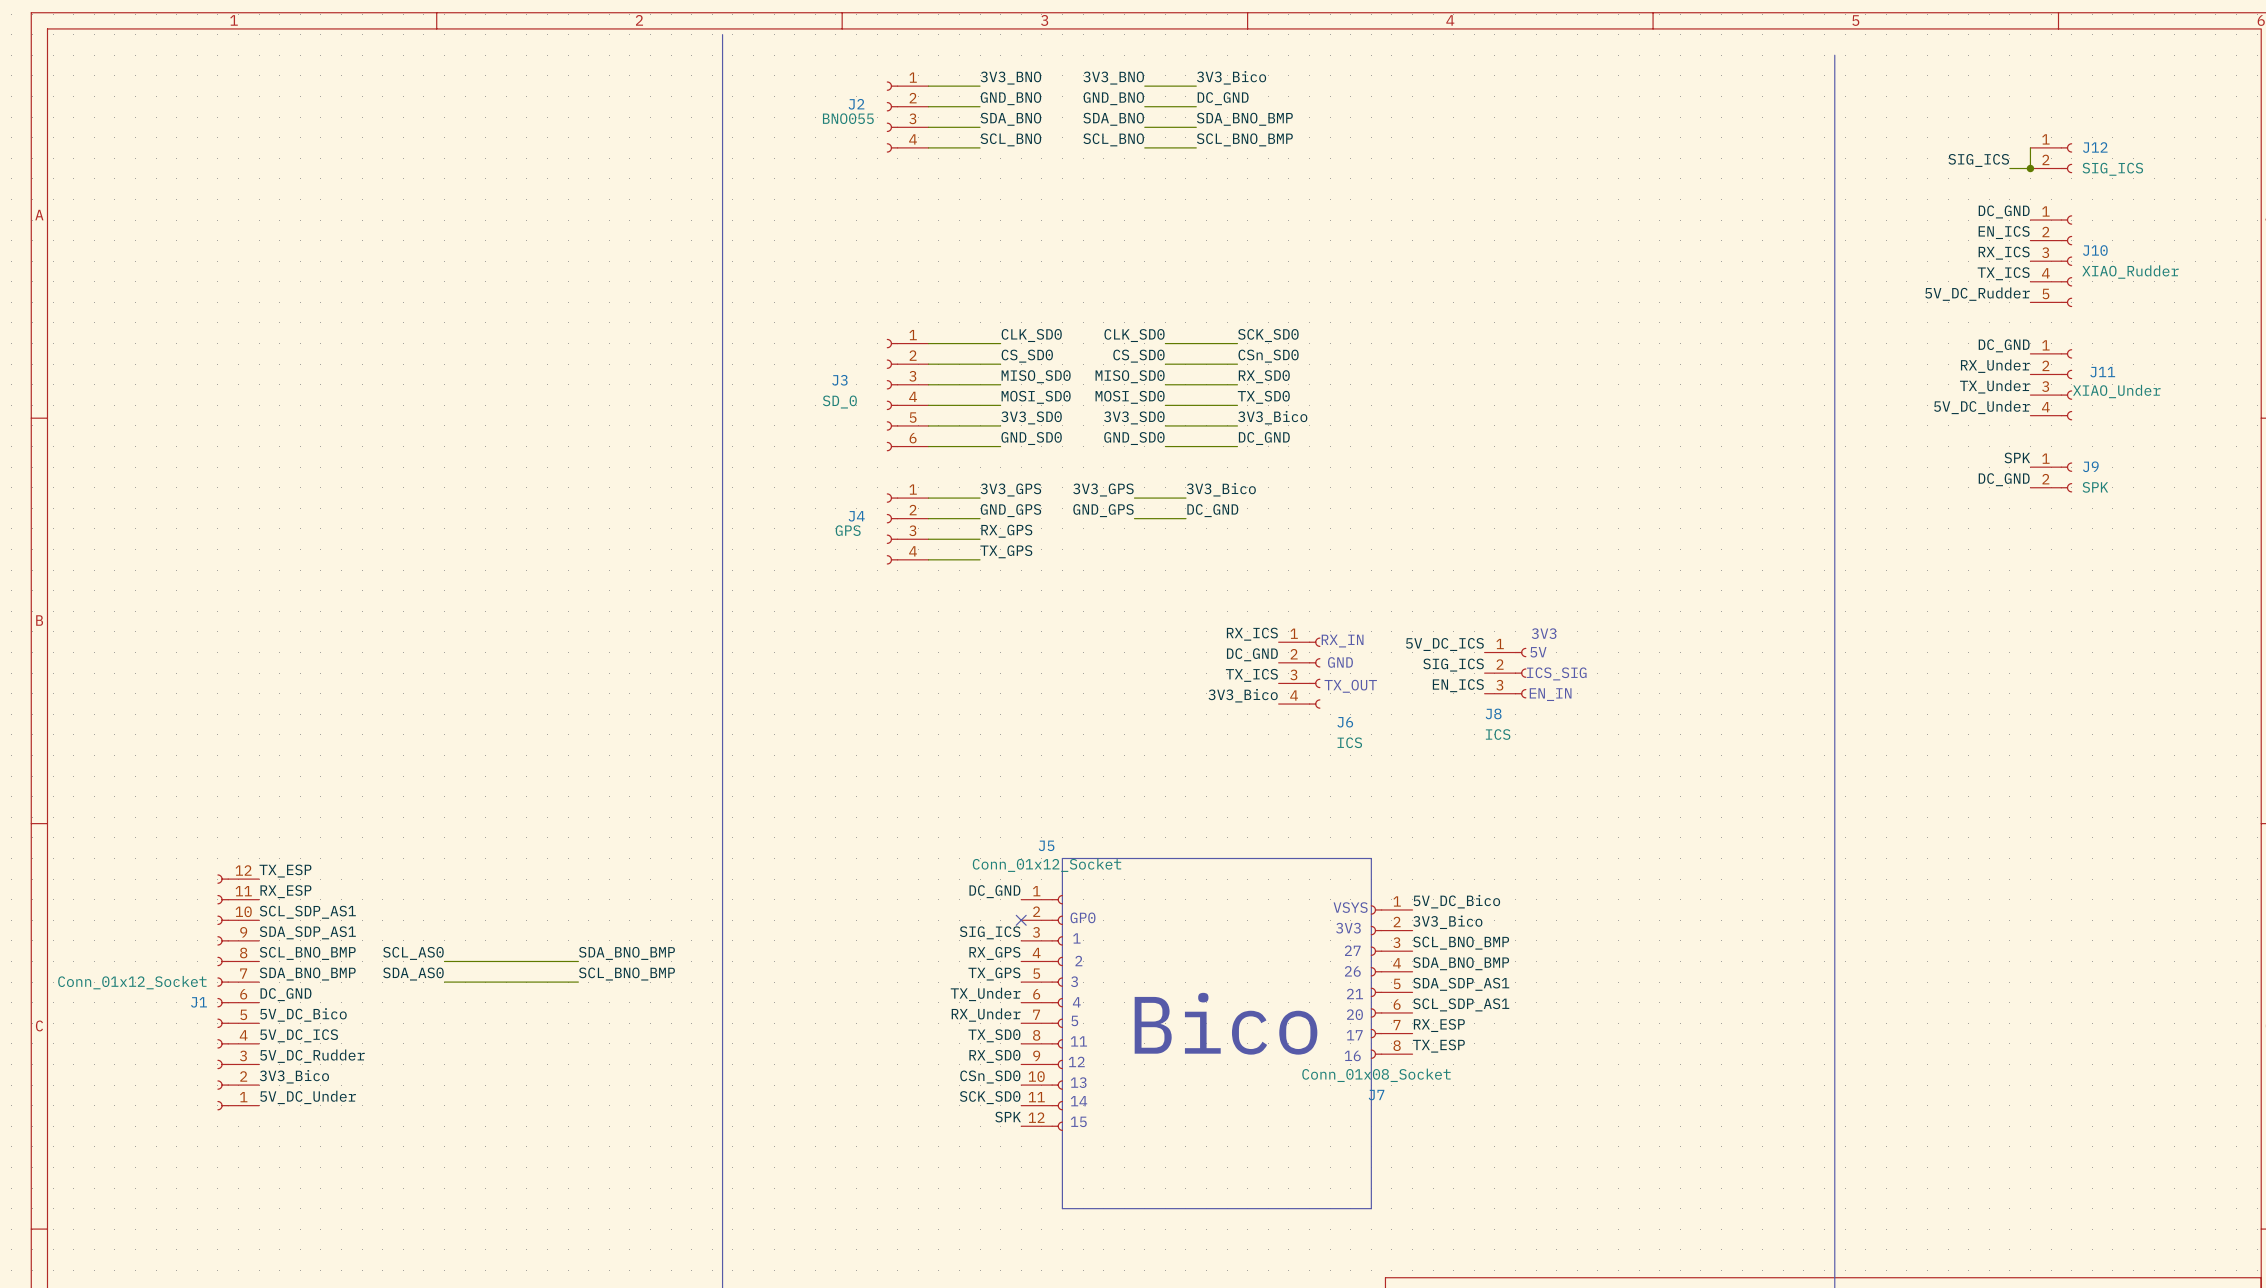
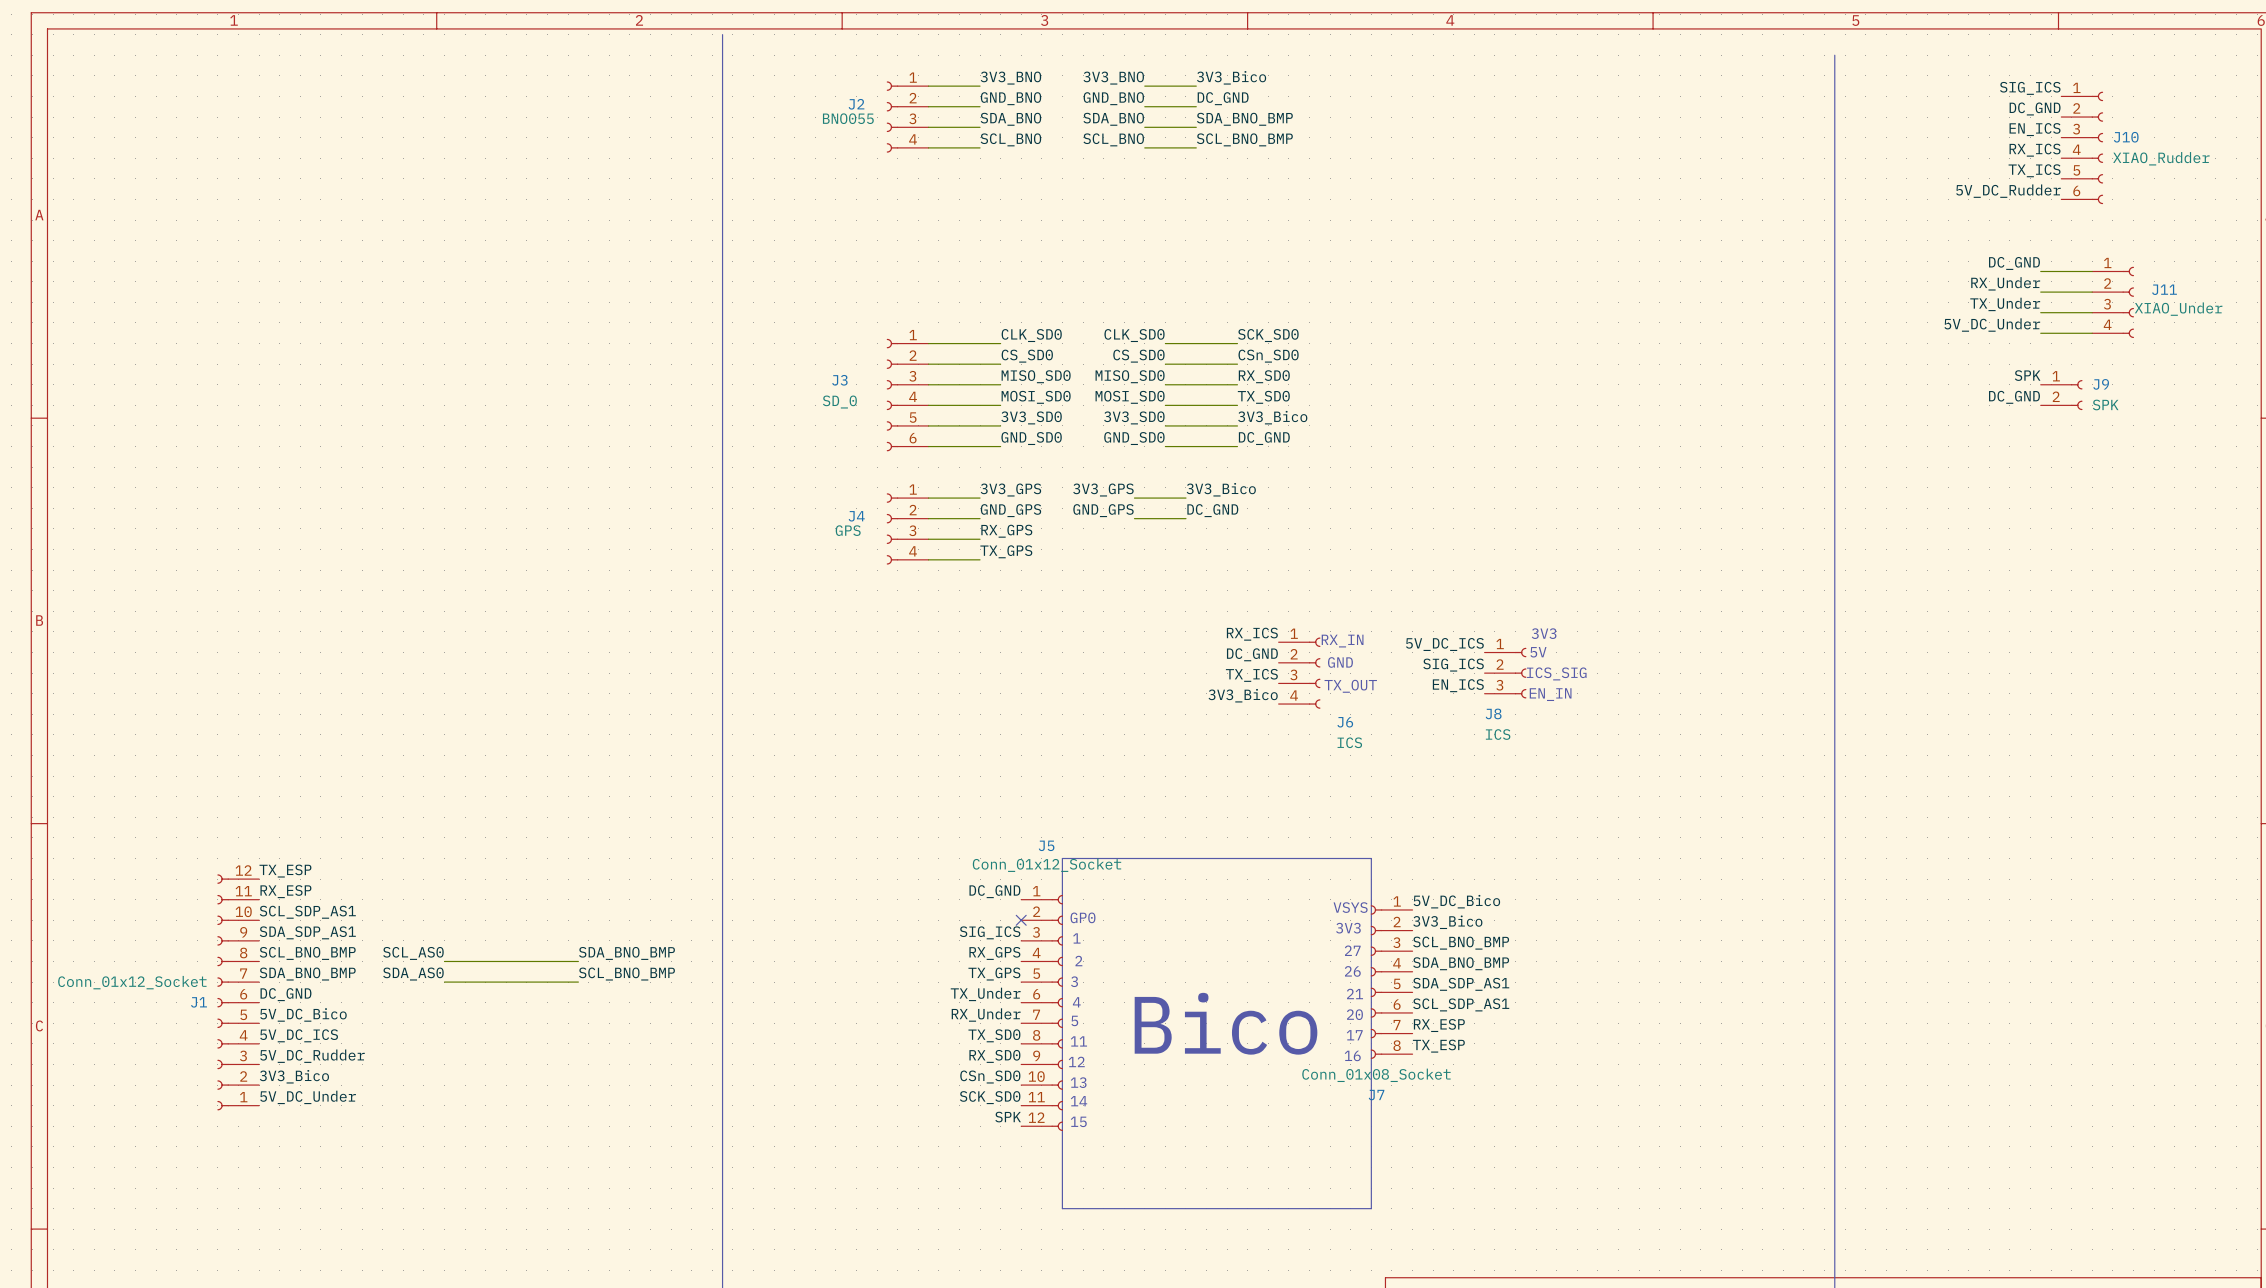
label: none -> DC_GND (2035, 108)
wire: (2030, 147) (2030, 168) (2009, 168) -> none
J12: SIG_ICS (2051, 158) -> none
label position: SIG_ICS (1978, 160) -> SIG_ICS (2030, 88)
junction: (2030, 168) -> none
label: DC_GND (2004, 211) -> none
J10 symbol: [2030, 215, 2073, 308] -> [2061, 91, 2104, 205]
label position: EN_ICS (2004, 232) -> EN_ICS (2035, 129)
label position: RX_ICS (2004, 253) -> RX_ICS (2035, 150)
label: none -> DC_GND (2014, 263)
wire: none -> (2040, 271) (2092, 271)
label position: TX_ICS (2003, 273) -> TX_ICS (2034, 170)
wire: none -> (2040, 292) (2092, 292)
label position: 5V_DC_Rudder (1977, 294) -> 5V_DC_Rudder (2008, 191)
wire: none -> (2040, 312) (2092, 312)
wire: none -> (2040, 333) (2092, 333)
label: DC_GND (2004, 345) -> none
label position: RX_Under (1995, 366) -> RX_Under (2005, 283)
J11 position: (2051, 384) -> (2113, 302)
label position: TX_Under (1994, 386) -> TX_Under (2005, 304)
label: none -> DC_GND (2014, 397)
label position: 5V_DC_Under (1981, 407) -> 5V_DC_Under (1992, 325)
label position: SPK (2017, 457) -> SPK (2027, 375)
J9 position: (2051, 477) -> (2061, 395)
label: DC_GND (2004, 479) -> none

